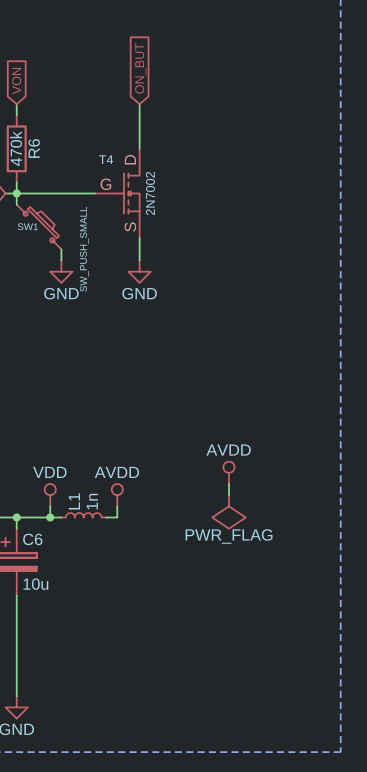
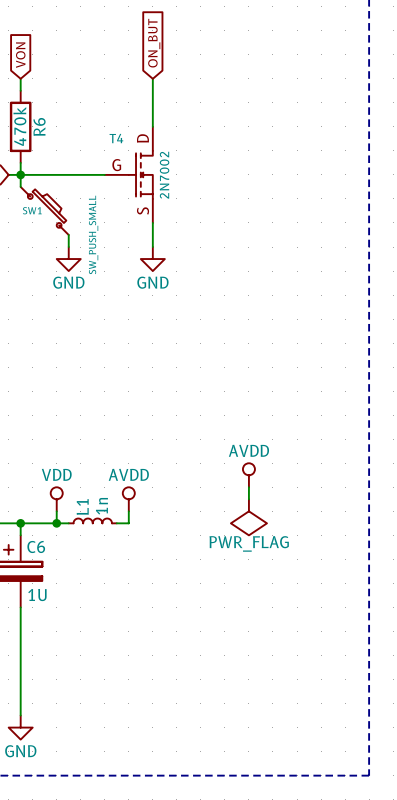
C6 value: 10u (35, 584) -> 1U (37, 595)

